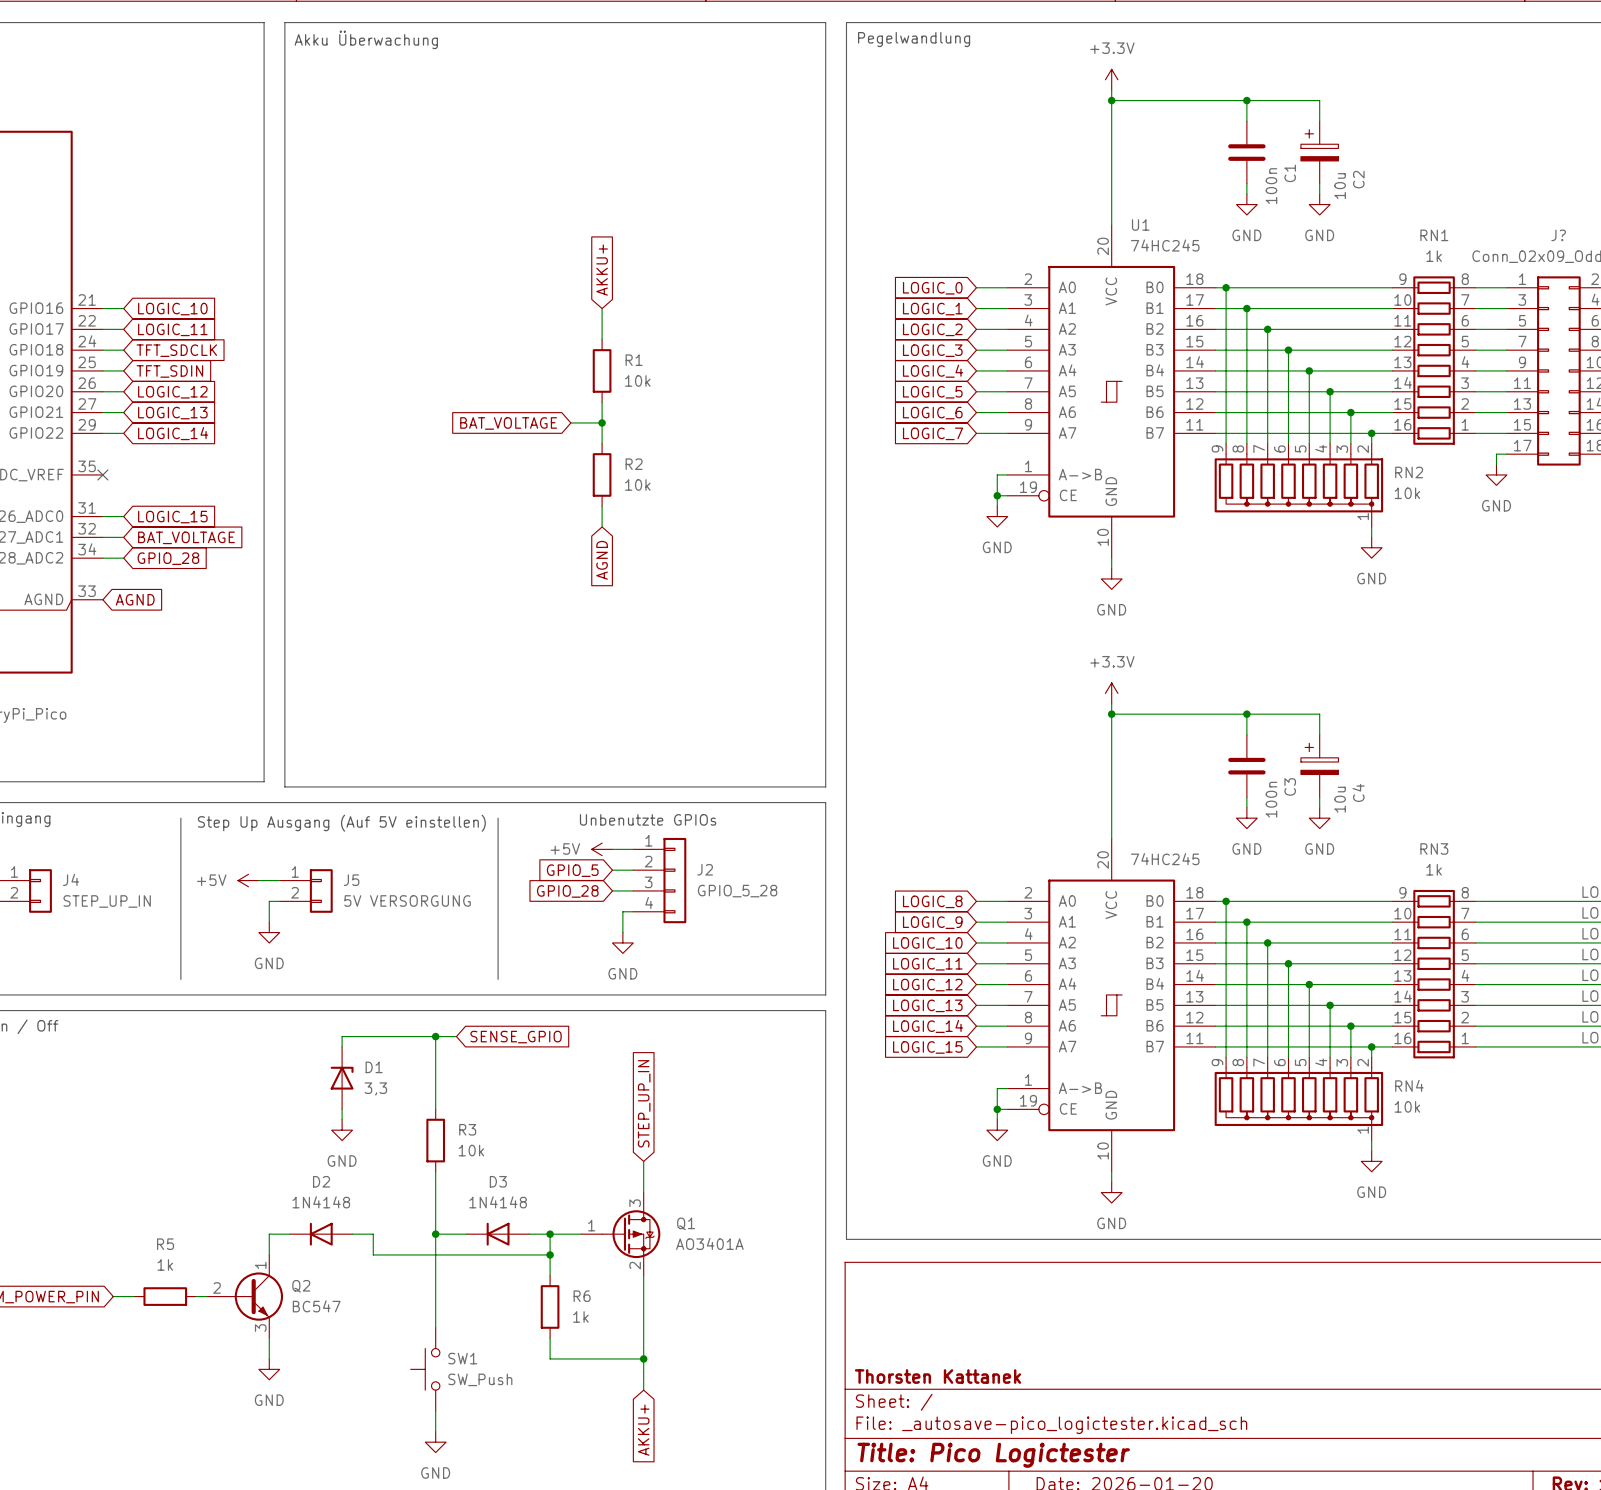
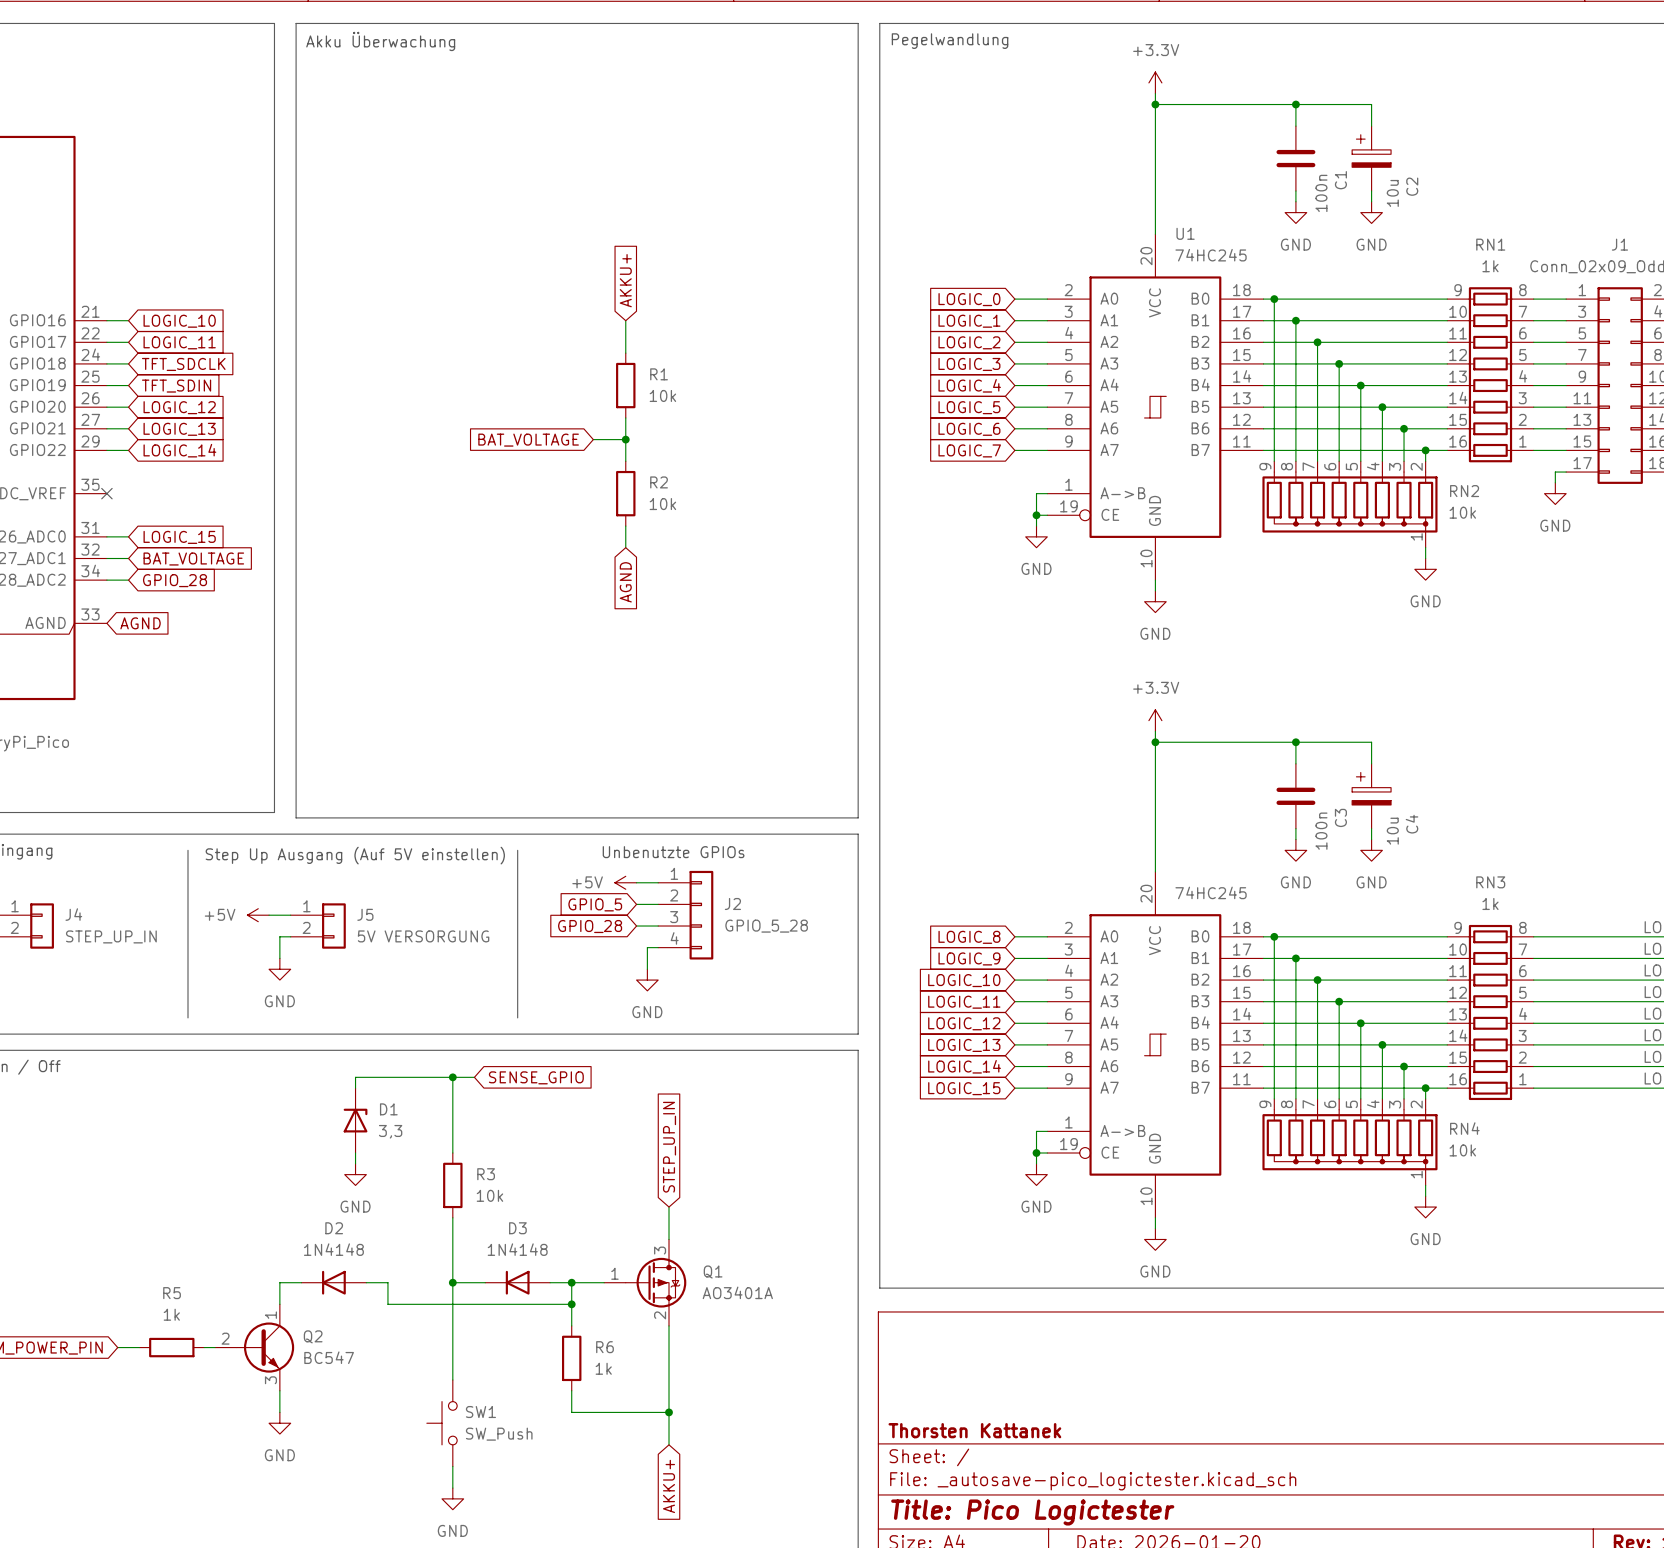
J? name: J? (1558, 235) -> J1 (1619, 244)

